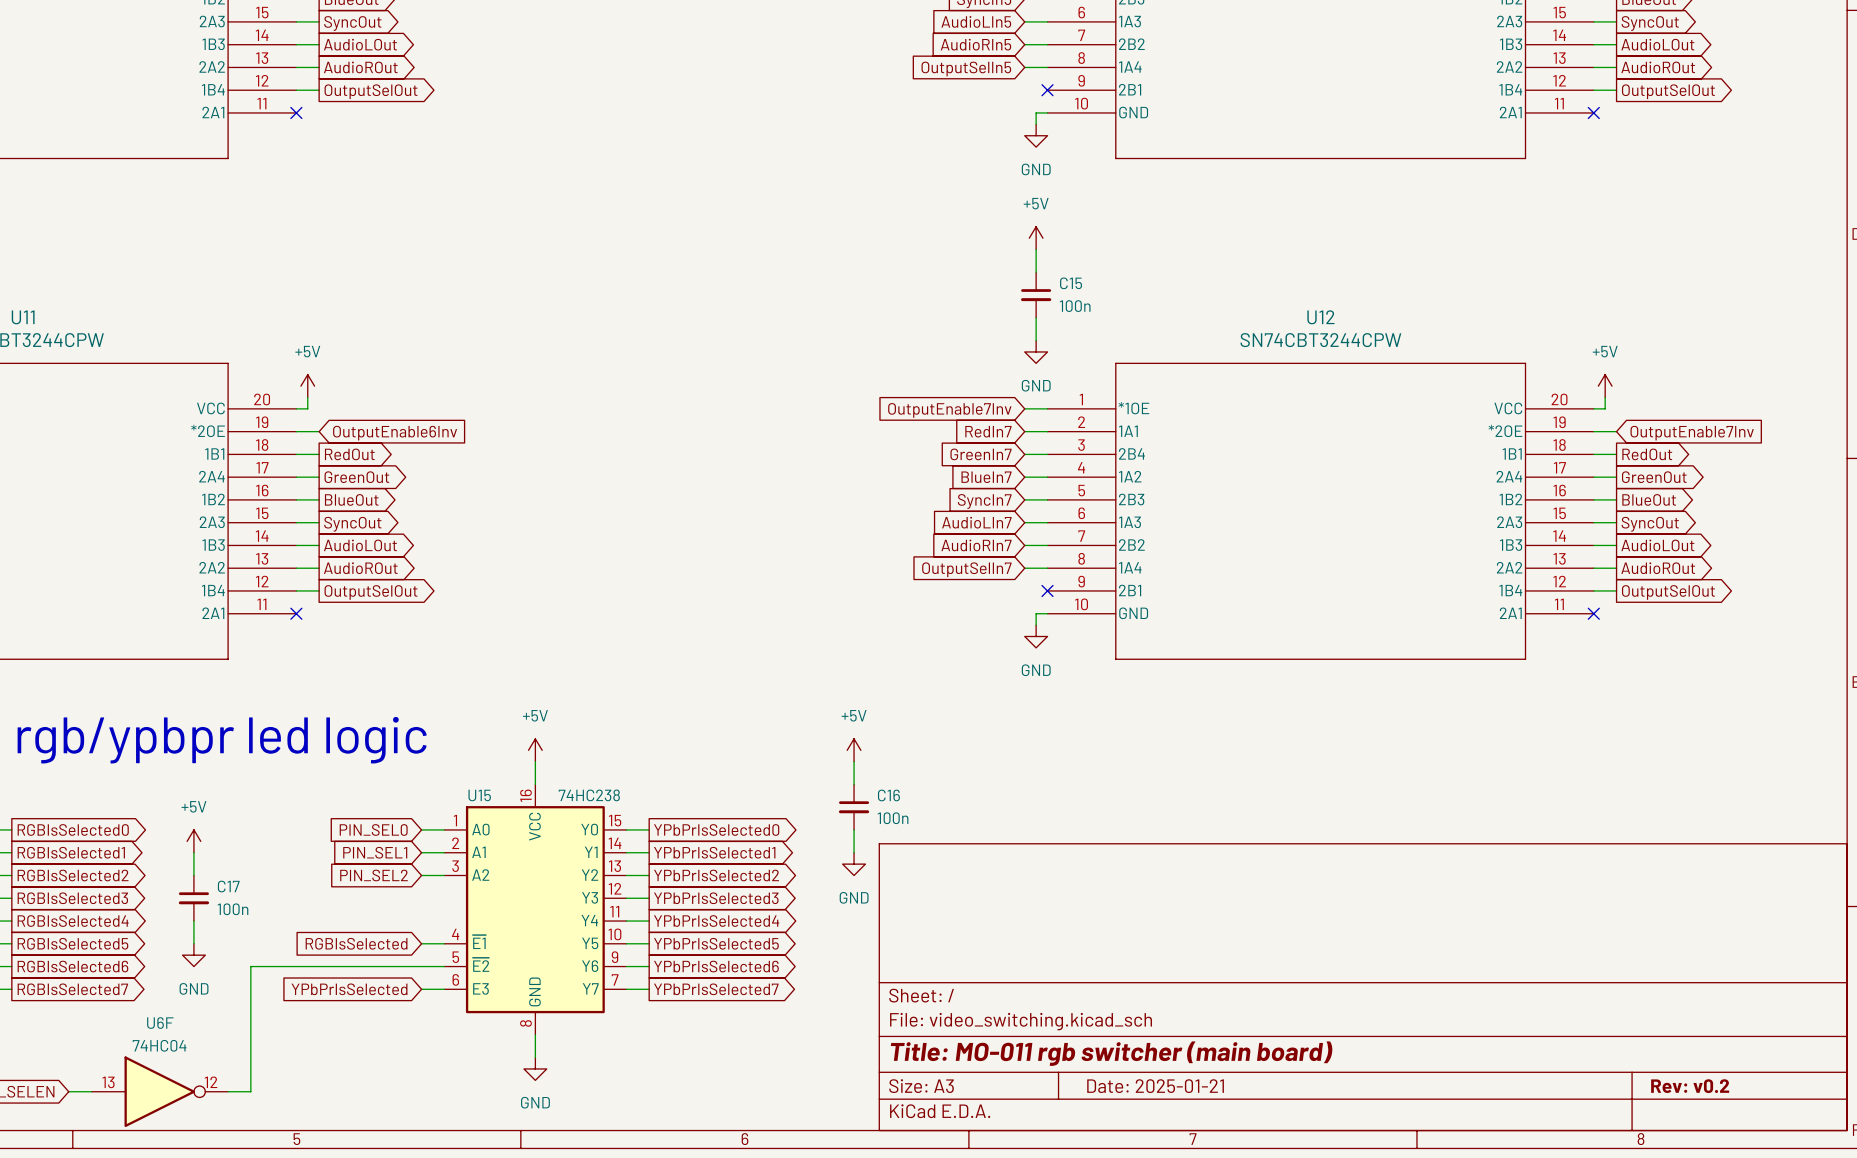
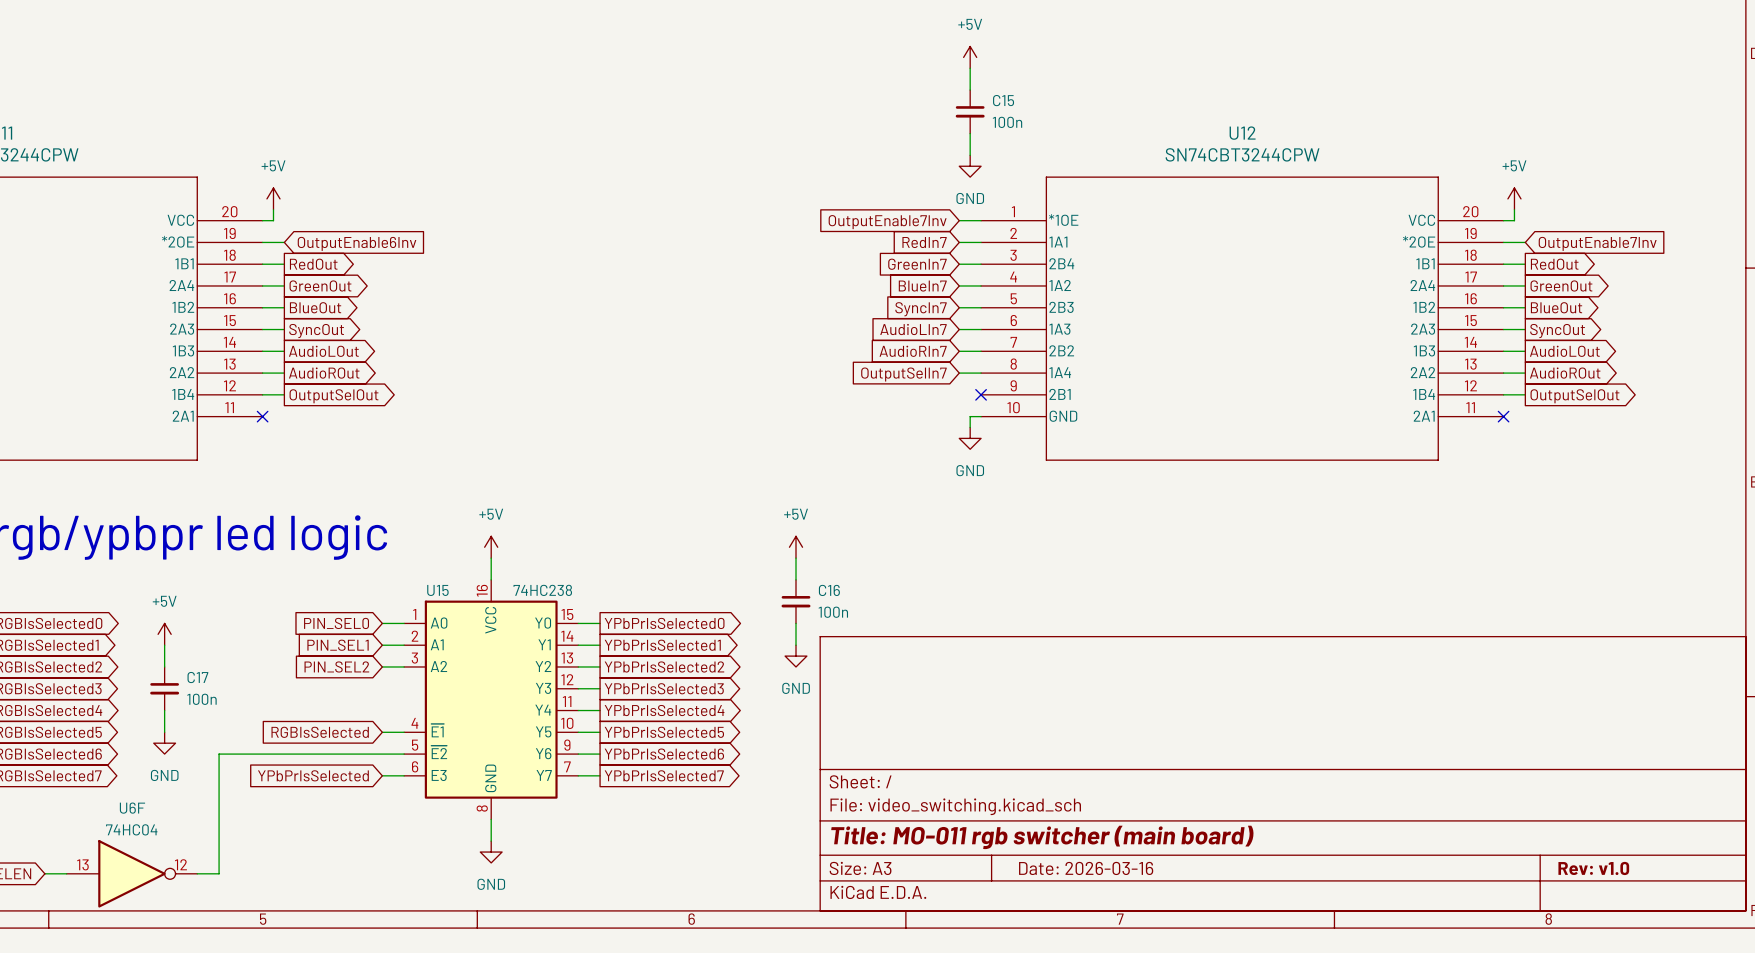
title block: Date: 2025-01-21 (1155, 1086) -> Date: 2026-03-16 (1086, 868)
title block: Rev: v0.2 (1690, 1086) -> Rev: v1.0 (1593, 868)

